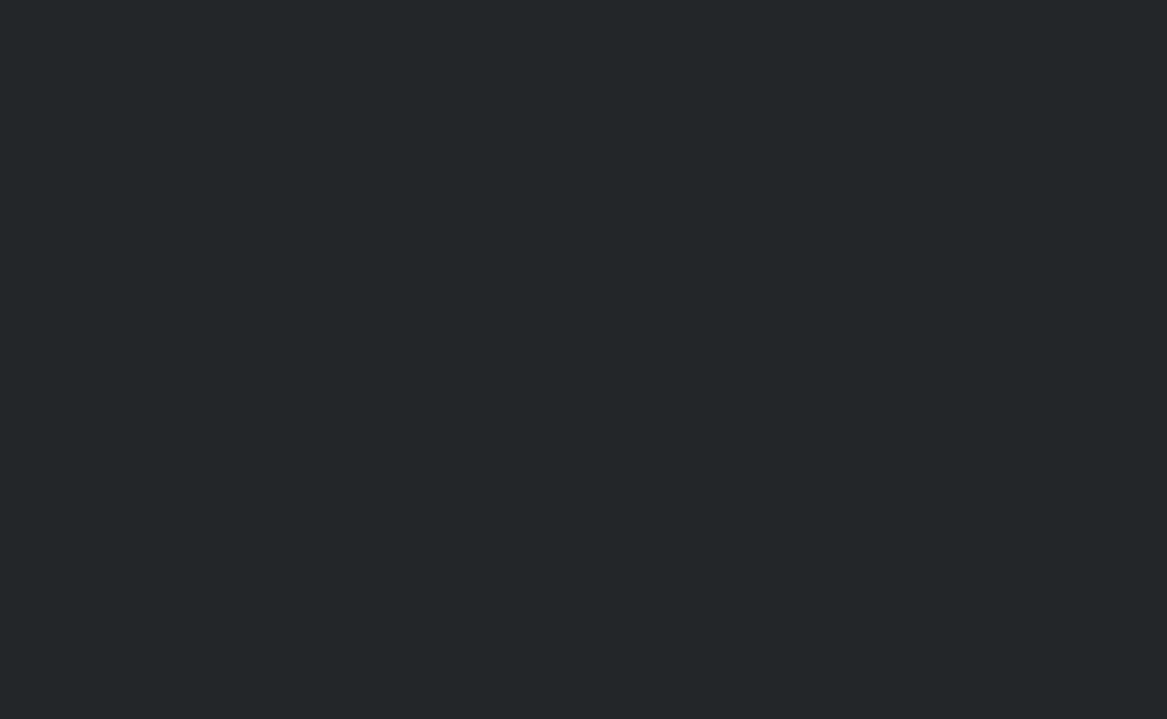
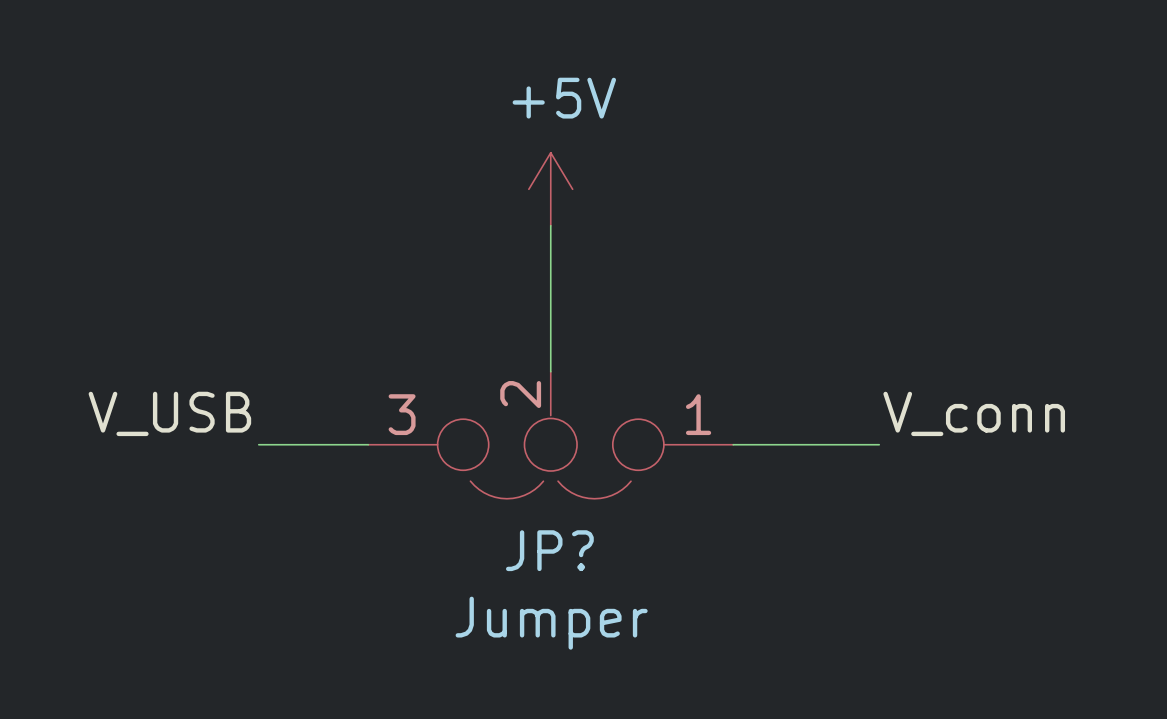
power symbol: none -> +5V (550, 189)
wire: none -> (550, 225) (550, 371)
label: none -> V_USB (169, 413)
label: none -> V_conn (974, 413)
JP?: none -> Jumper (550, 435)
wire: none -> (258, 444) (368, 444)
wire: none -> (733, 444) (879, 444)

